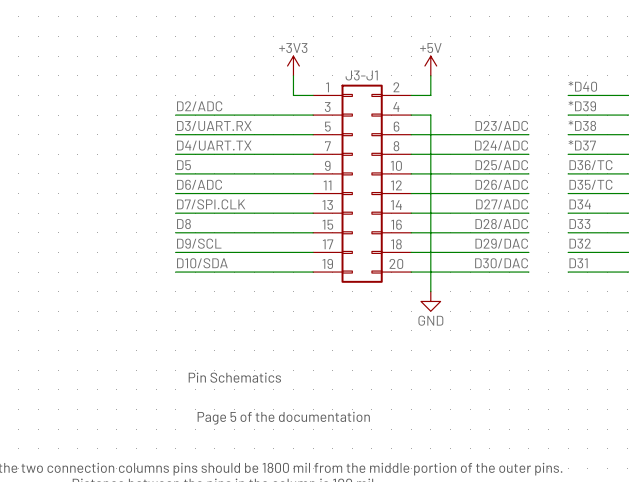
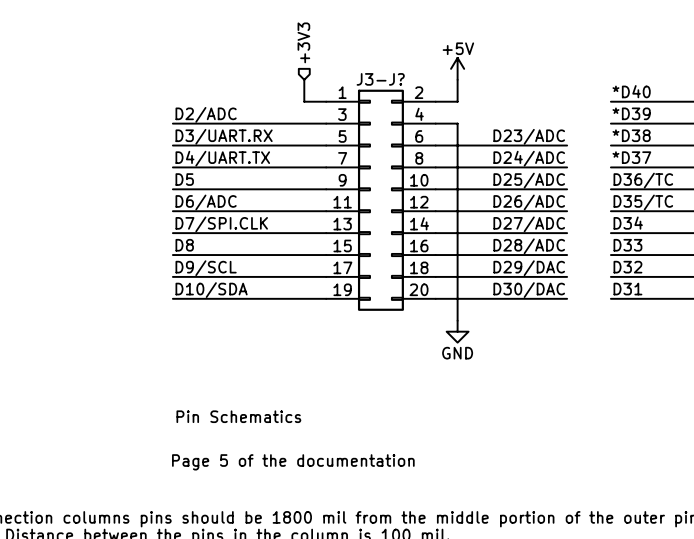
hierarchical label: none -> +3V3 (303, 42)
power symbol: +3V3 (293, 66) -> none
J3-J1 name: J3-J1 (361, 75) -> J3-J? (380, 79)

